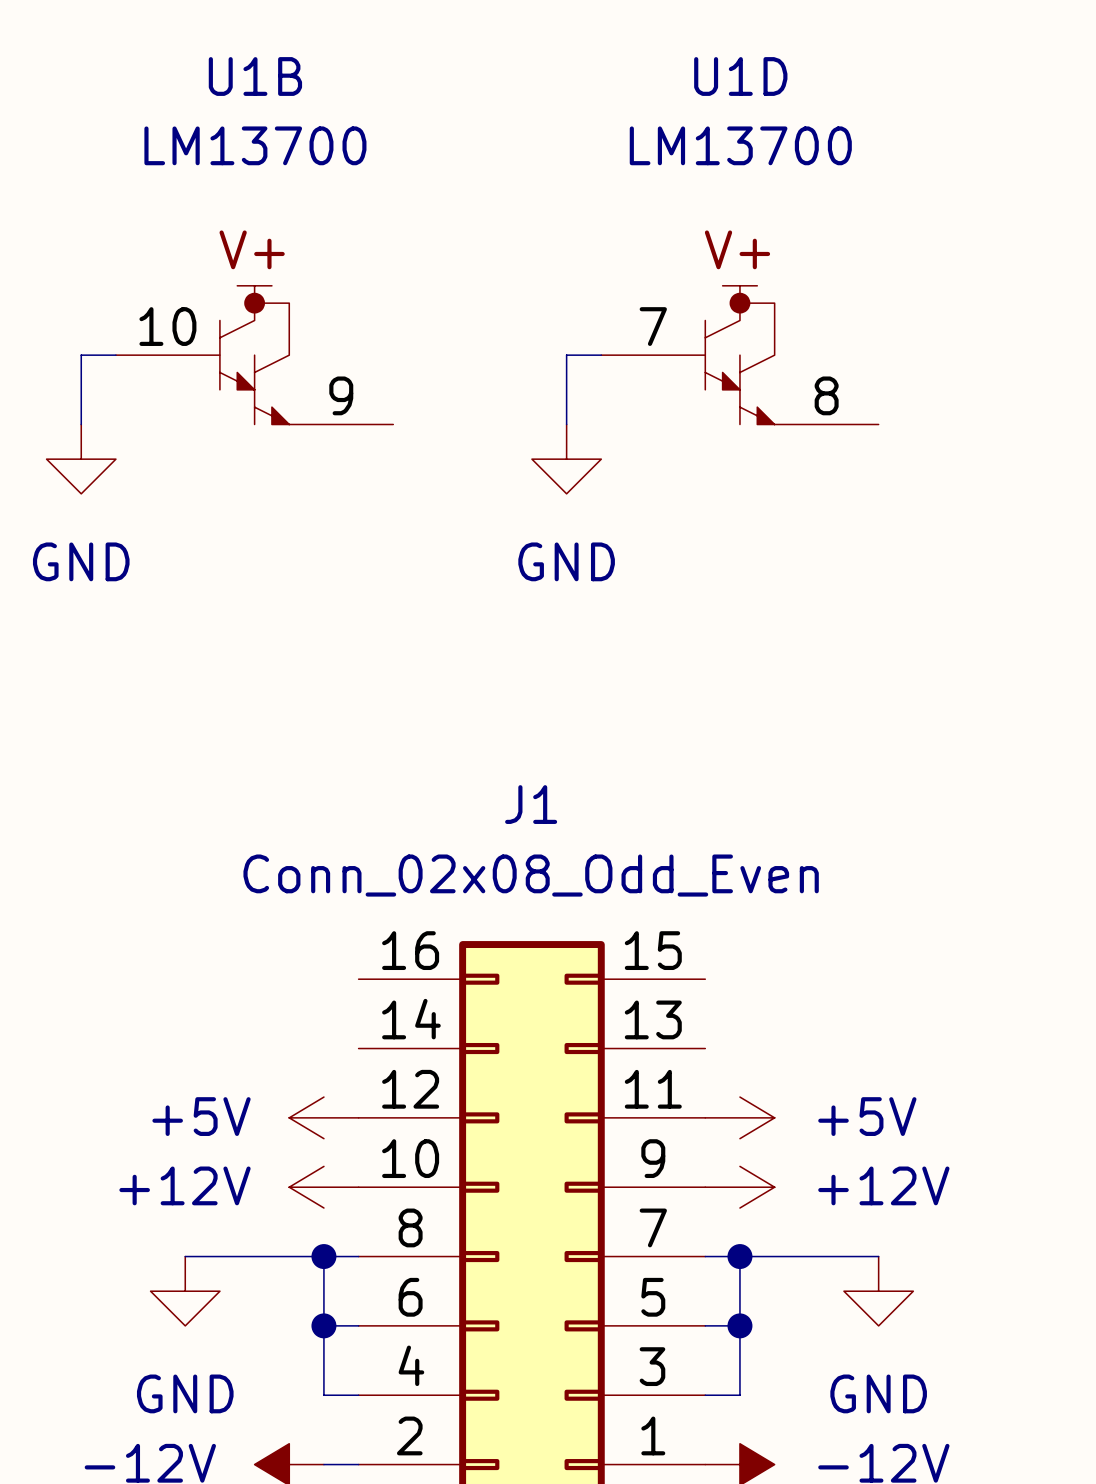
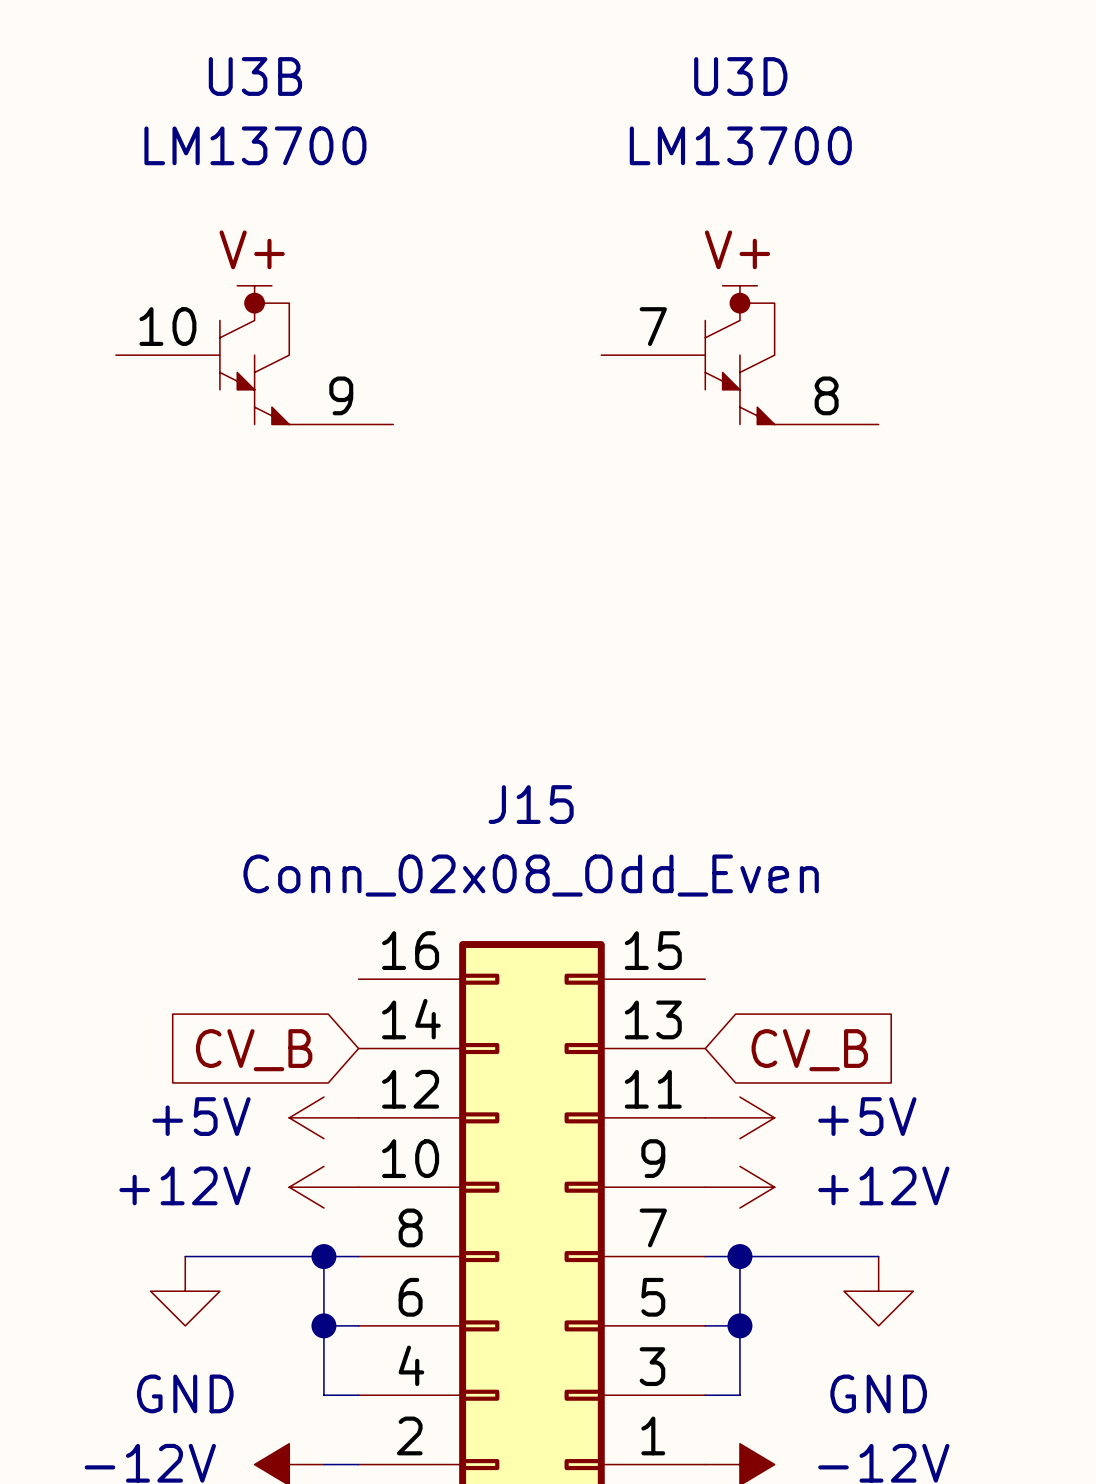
U1B name: U1B (255, 76) -> U3B (255, 76)
U1D name: U1D (740, 76) -> U3D (740, 76)
wire: (115, 355) (81, 355) (81, 424) -> none
wire: (601, 355) (566, 355) (566, 424) -> none
power symbol: GND (81, 459) -> none
power symbol: GND (566, 459) -> none
J1 name: J1 (531, 804) -> J15 (531, 804)
global label: none -> CV_B (254, 1050)
global label: none -> CV_B (809, 1050)

